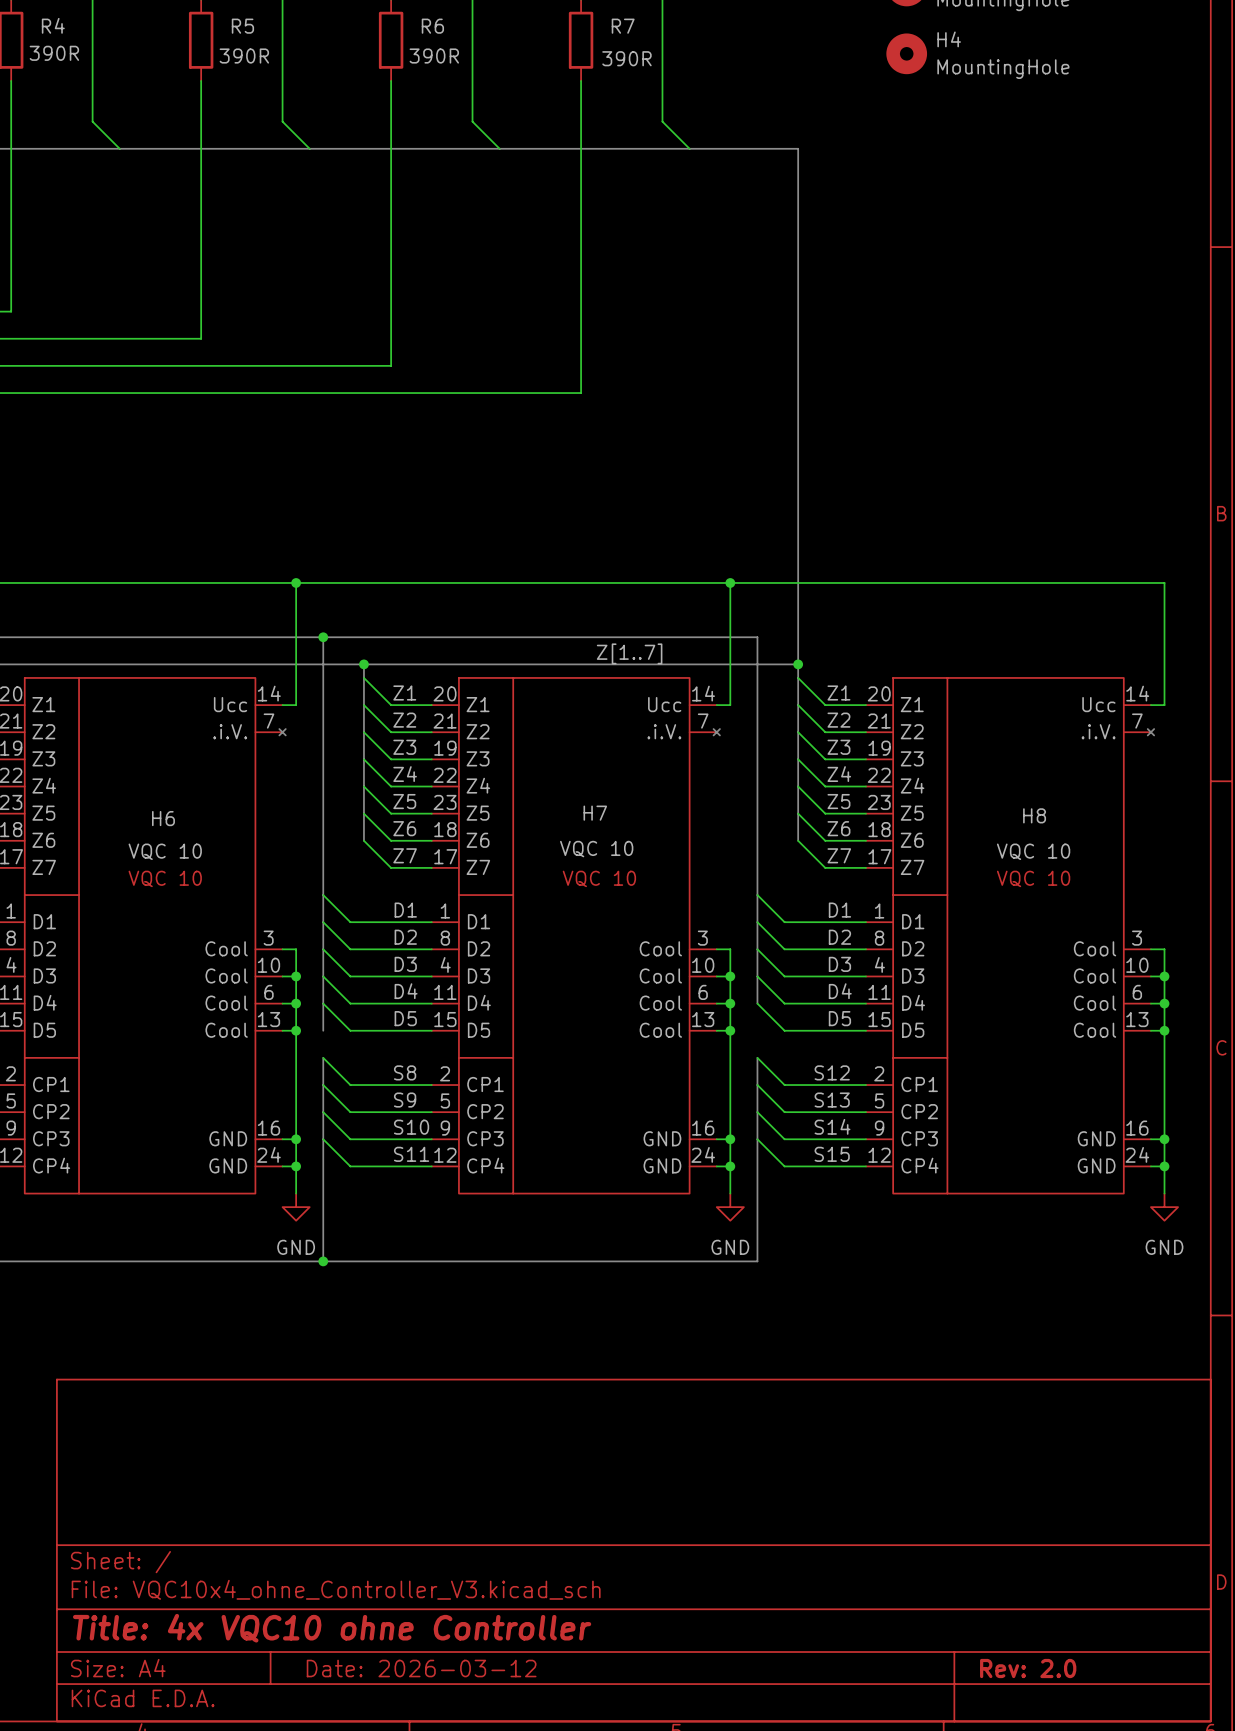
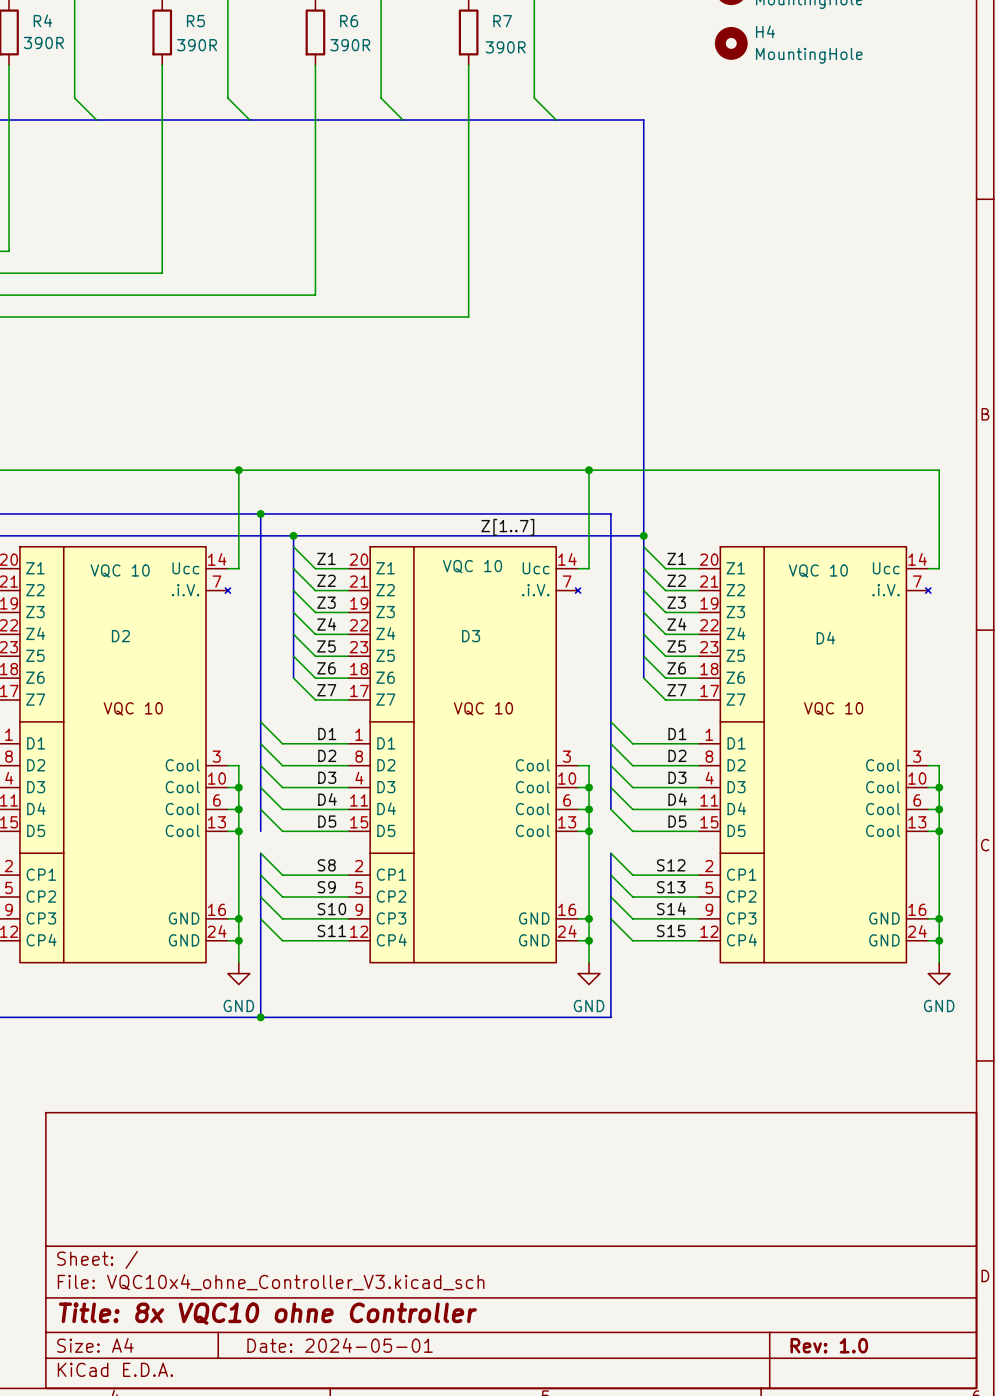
H7 name: H7 (595, 813) -> D3 (471, 636)
H8 name: H8 (1034, 815) -> D4 (825, 638)
H6 name: H6 (163, 818) -> D2 (120, 636)
H7 value position: VQC 10 (596, 849) -> VQC 10 (472, 566)
H6 value position: VQC 10 (165, 851) -> VQC 10 (120, 570)
H8 value position: VQC 10 (1033, 851) -> VQC 10 (818, 570)
title block: Title: 4x VQC10 ohne Controller (332, 1628) -> Title: 8x VQC10 ohne Controller (267, 1313)
title block: Date: 2026-03-12 (421, 1668) -> Date: 2024-05-01 (340, 1345)
title block: Rev: 2.0 (1028, 1668) -> Rev: 1.0 (829, 1345)

